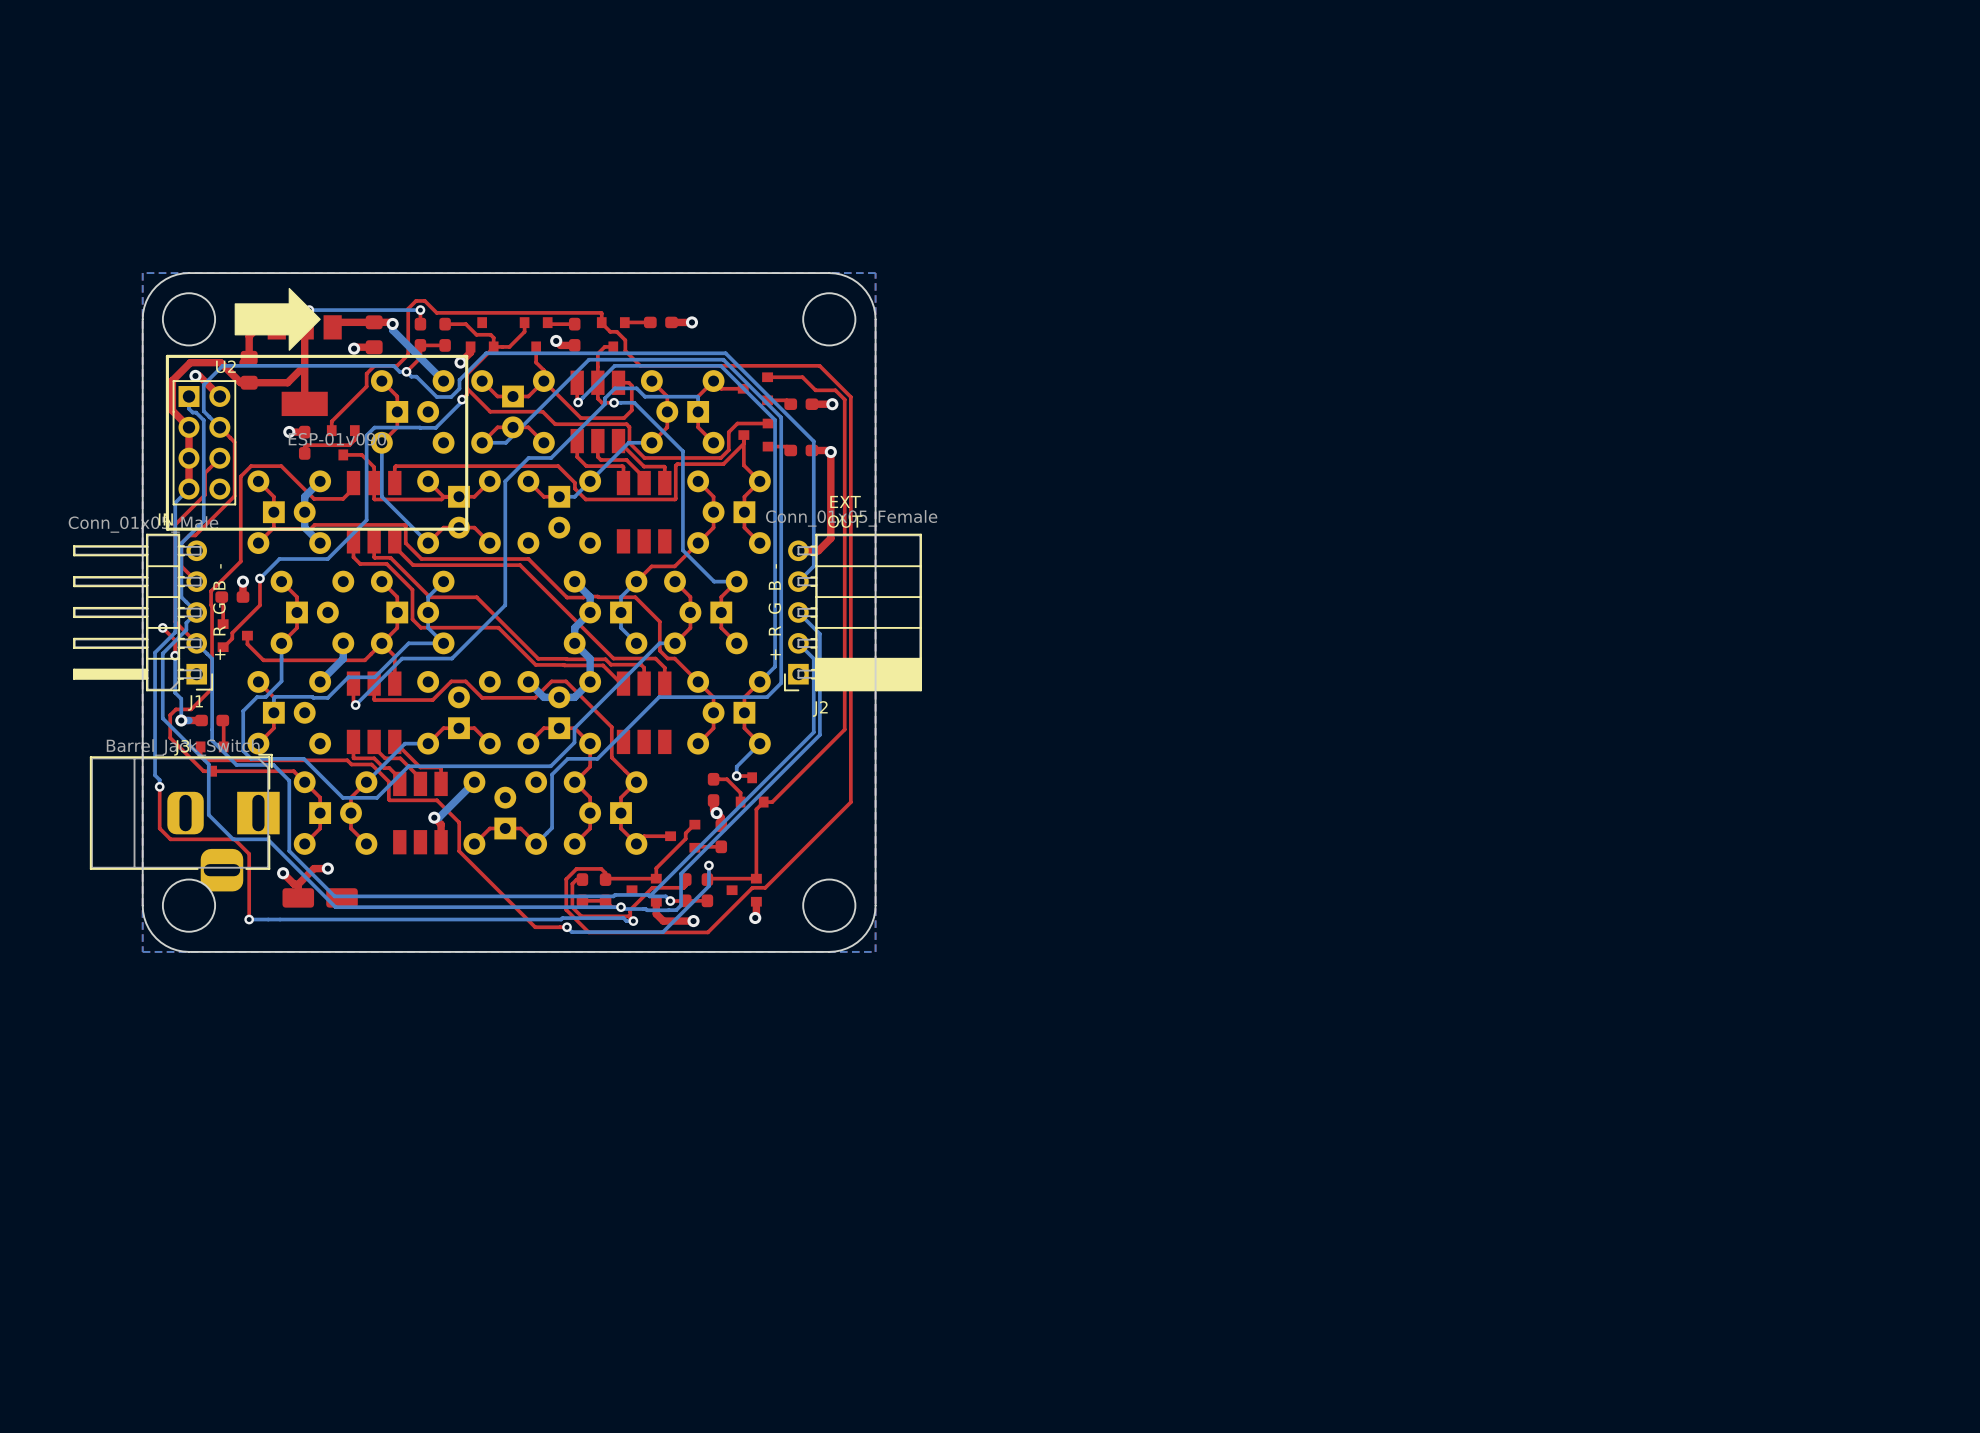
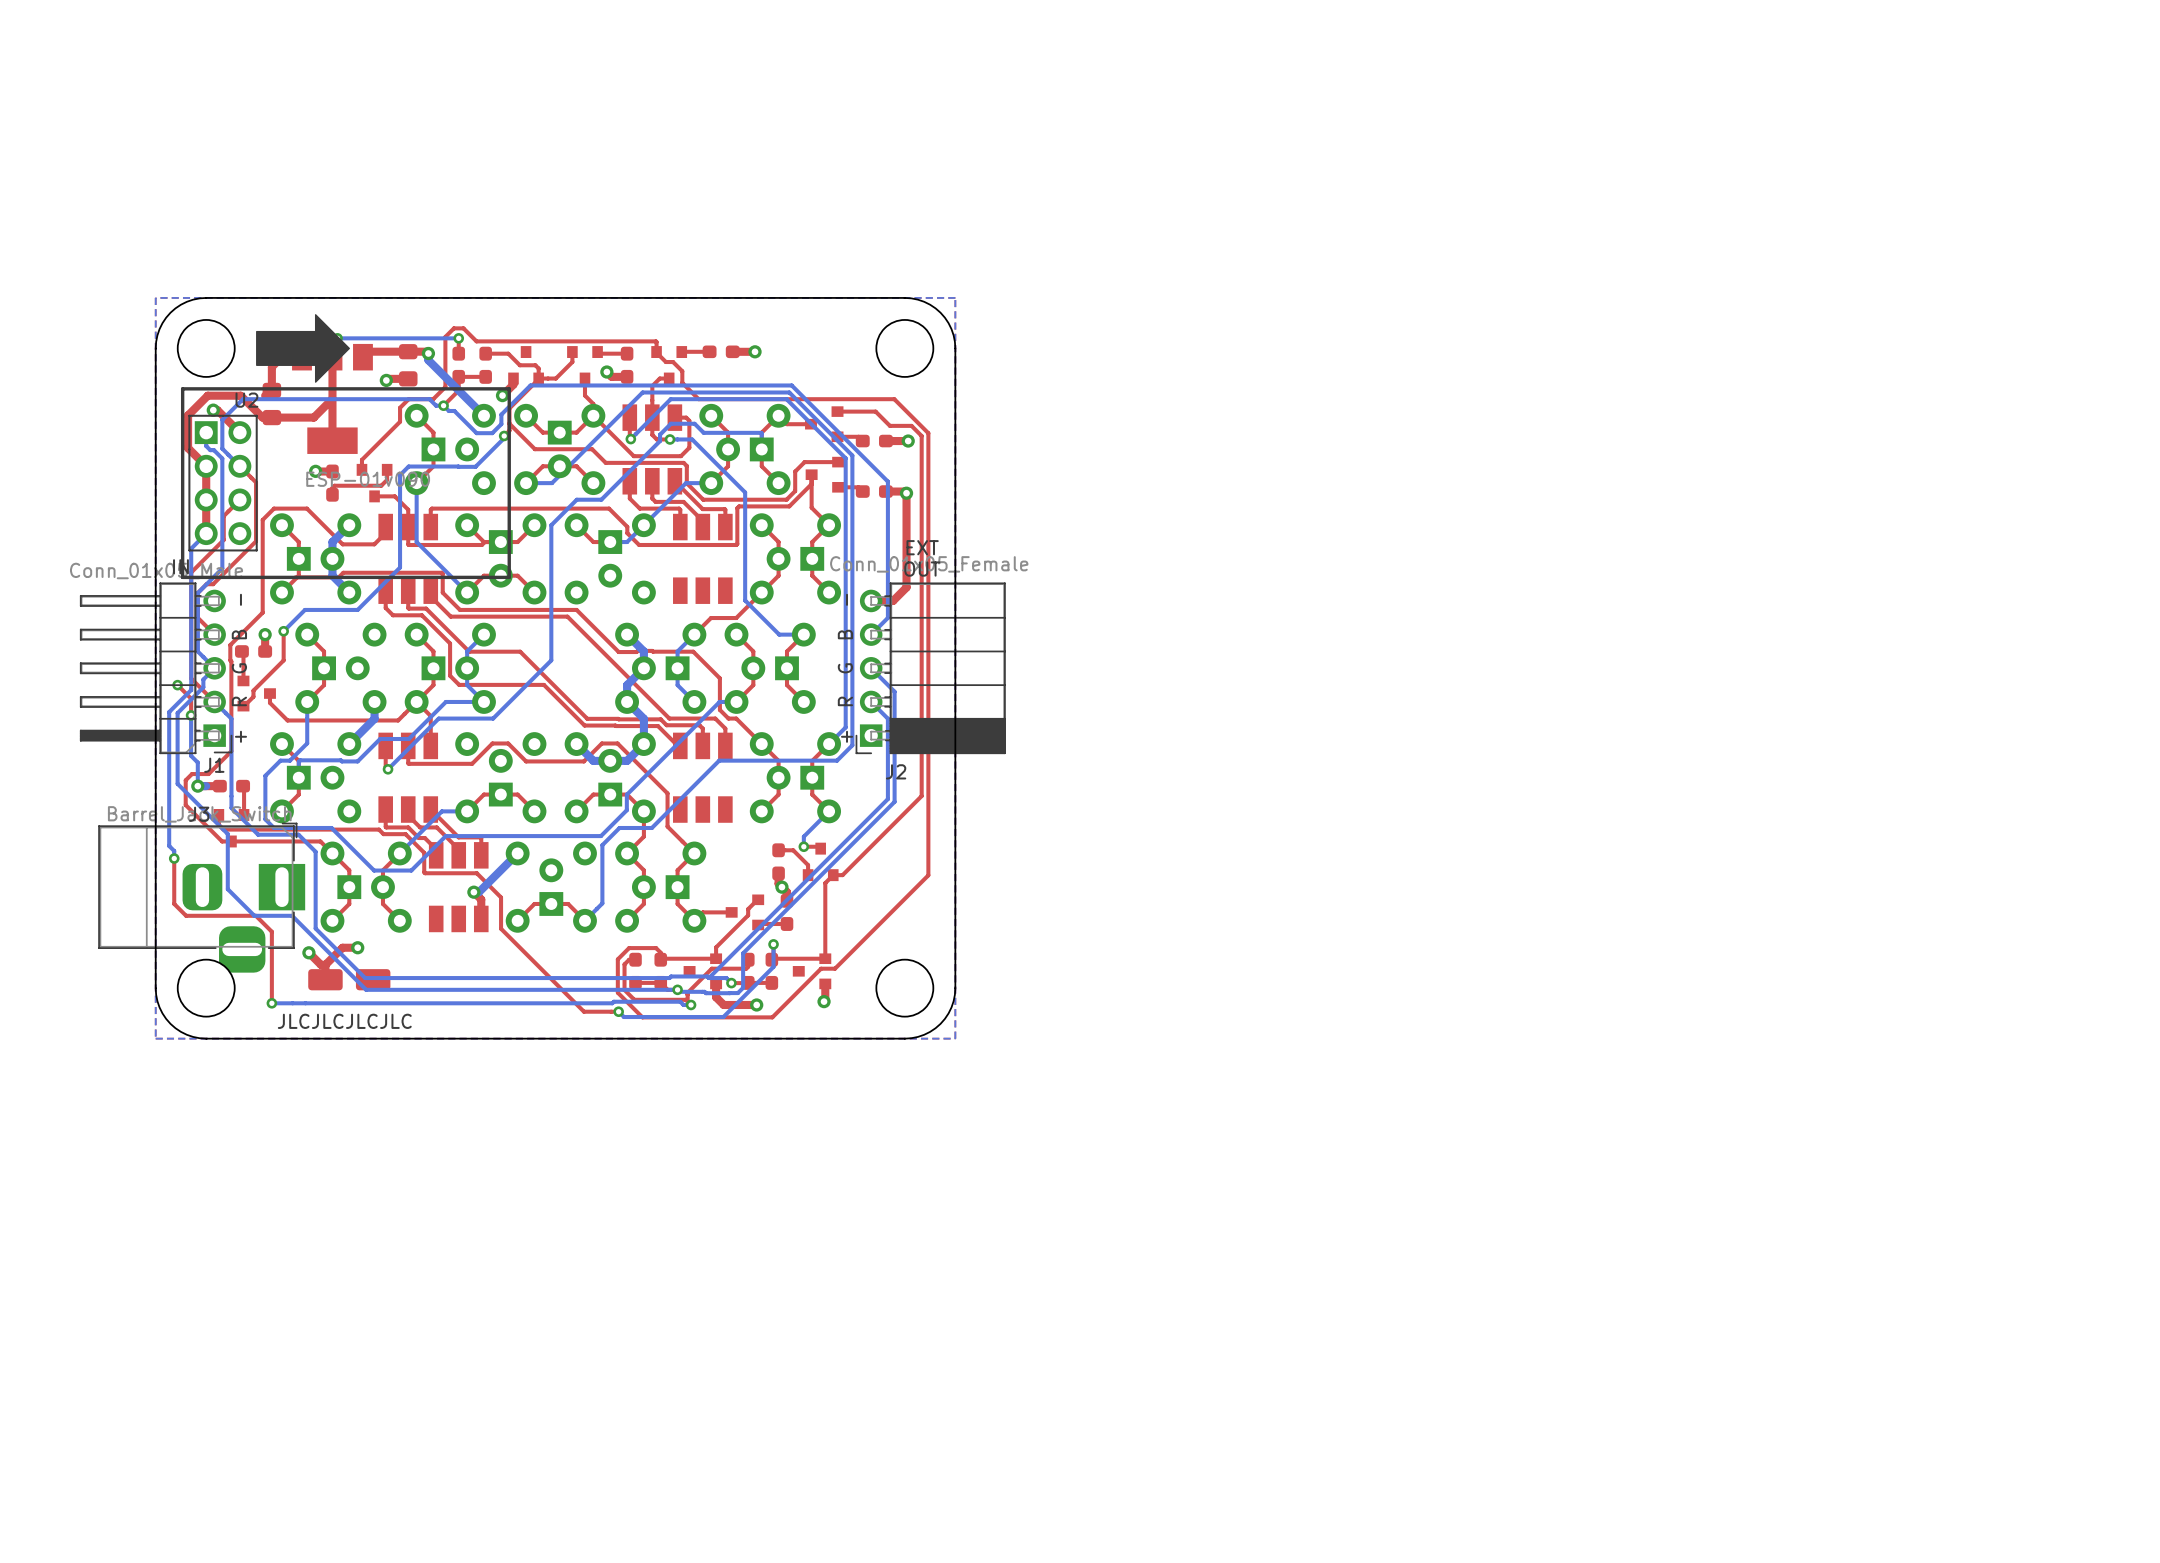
text: none -> JLCJLCJLCJLC (344, 1021)

